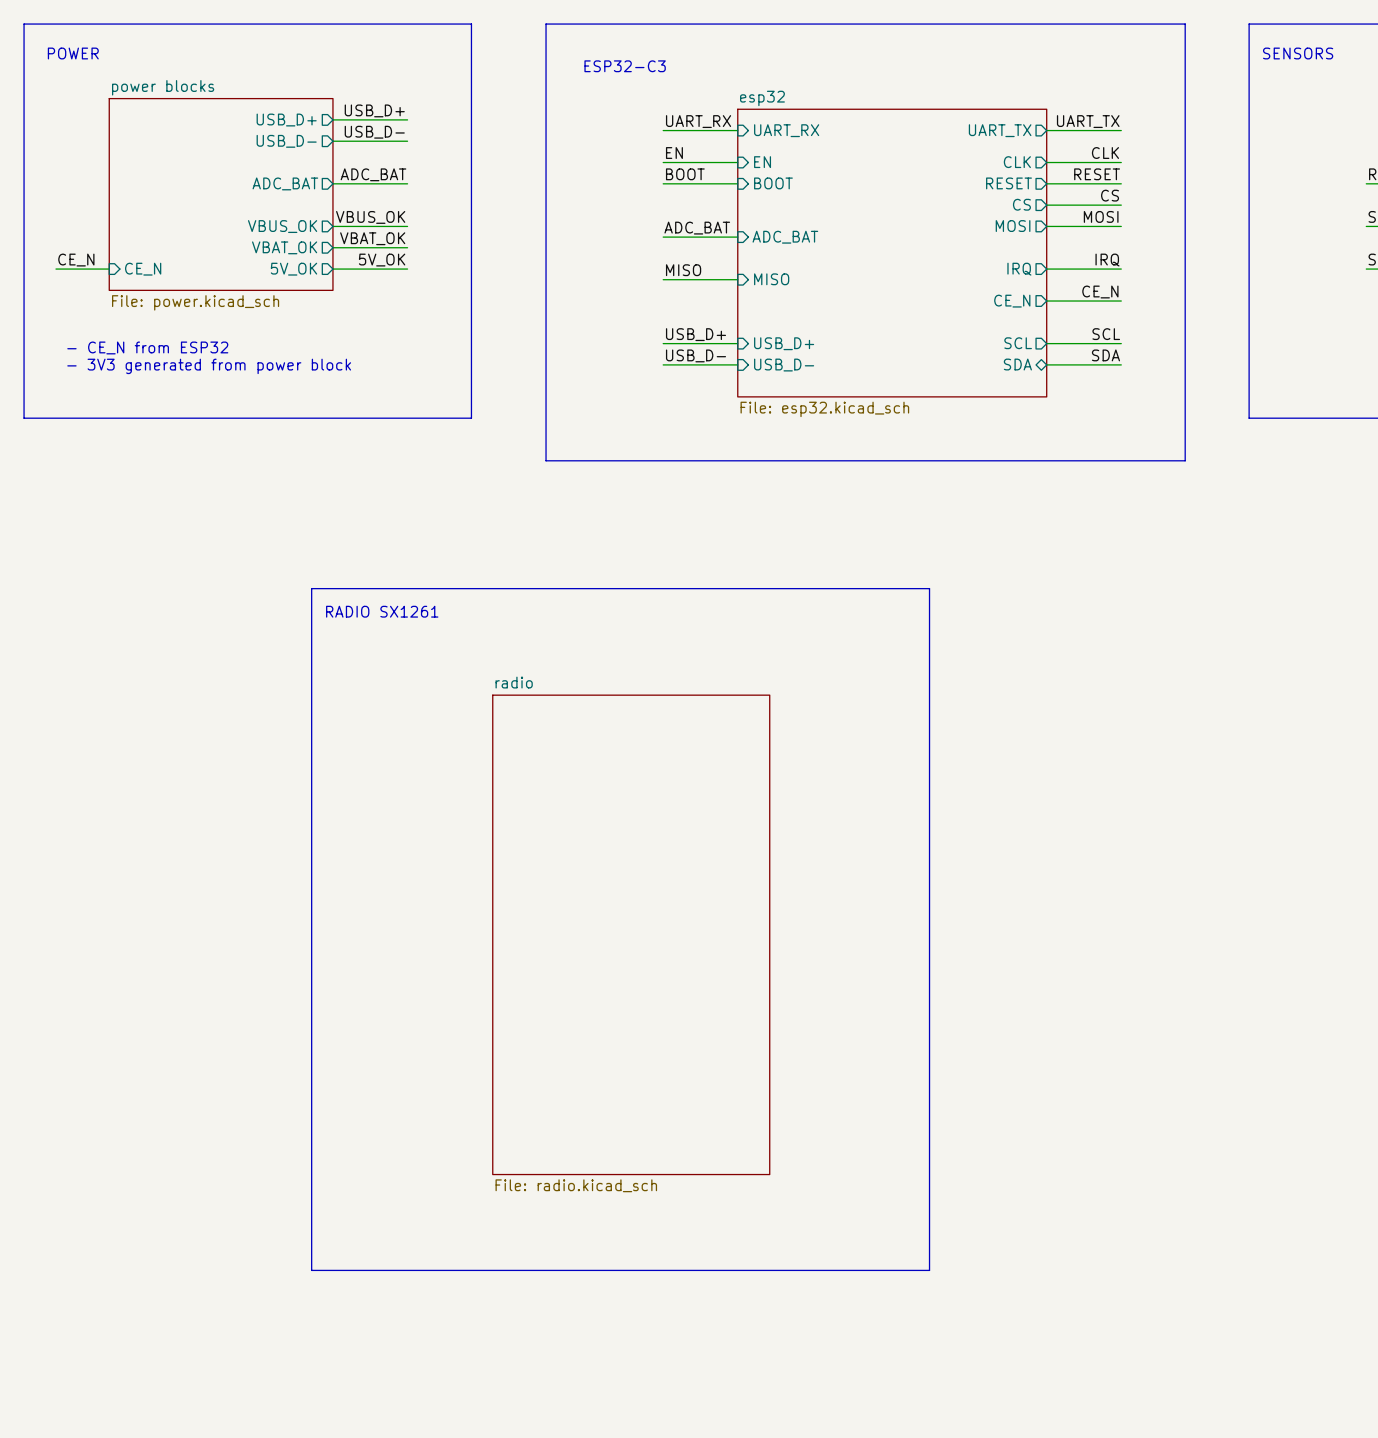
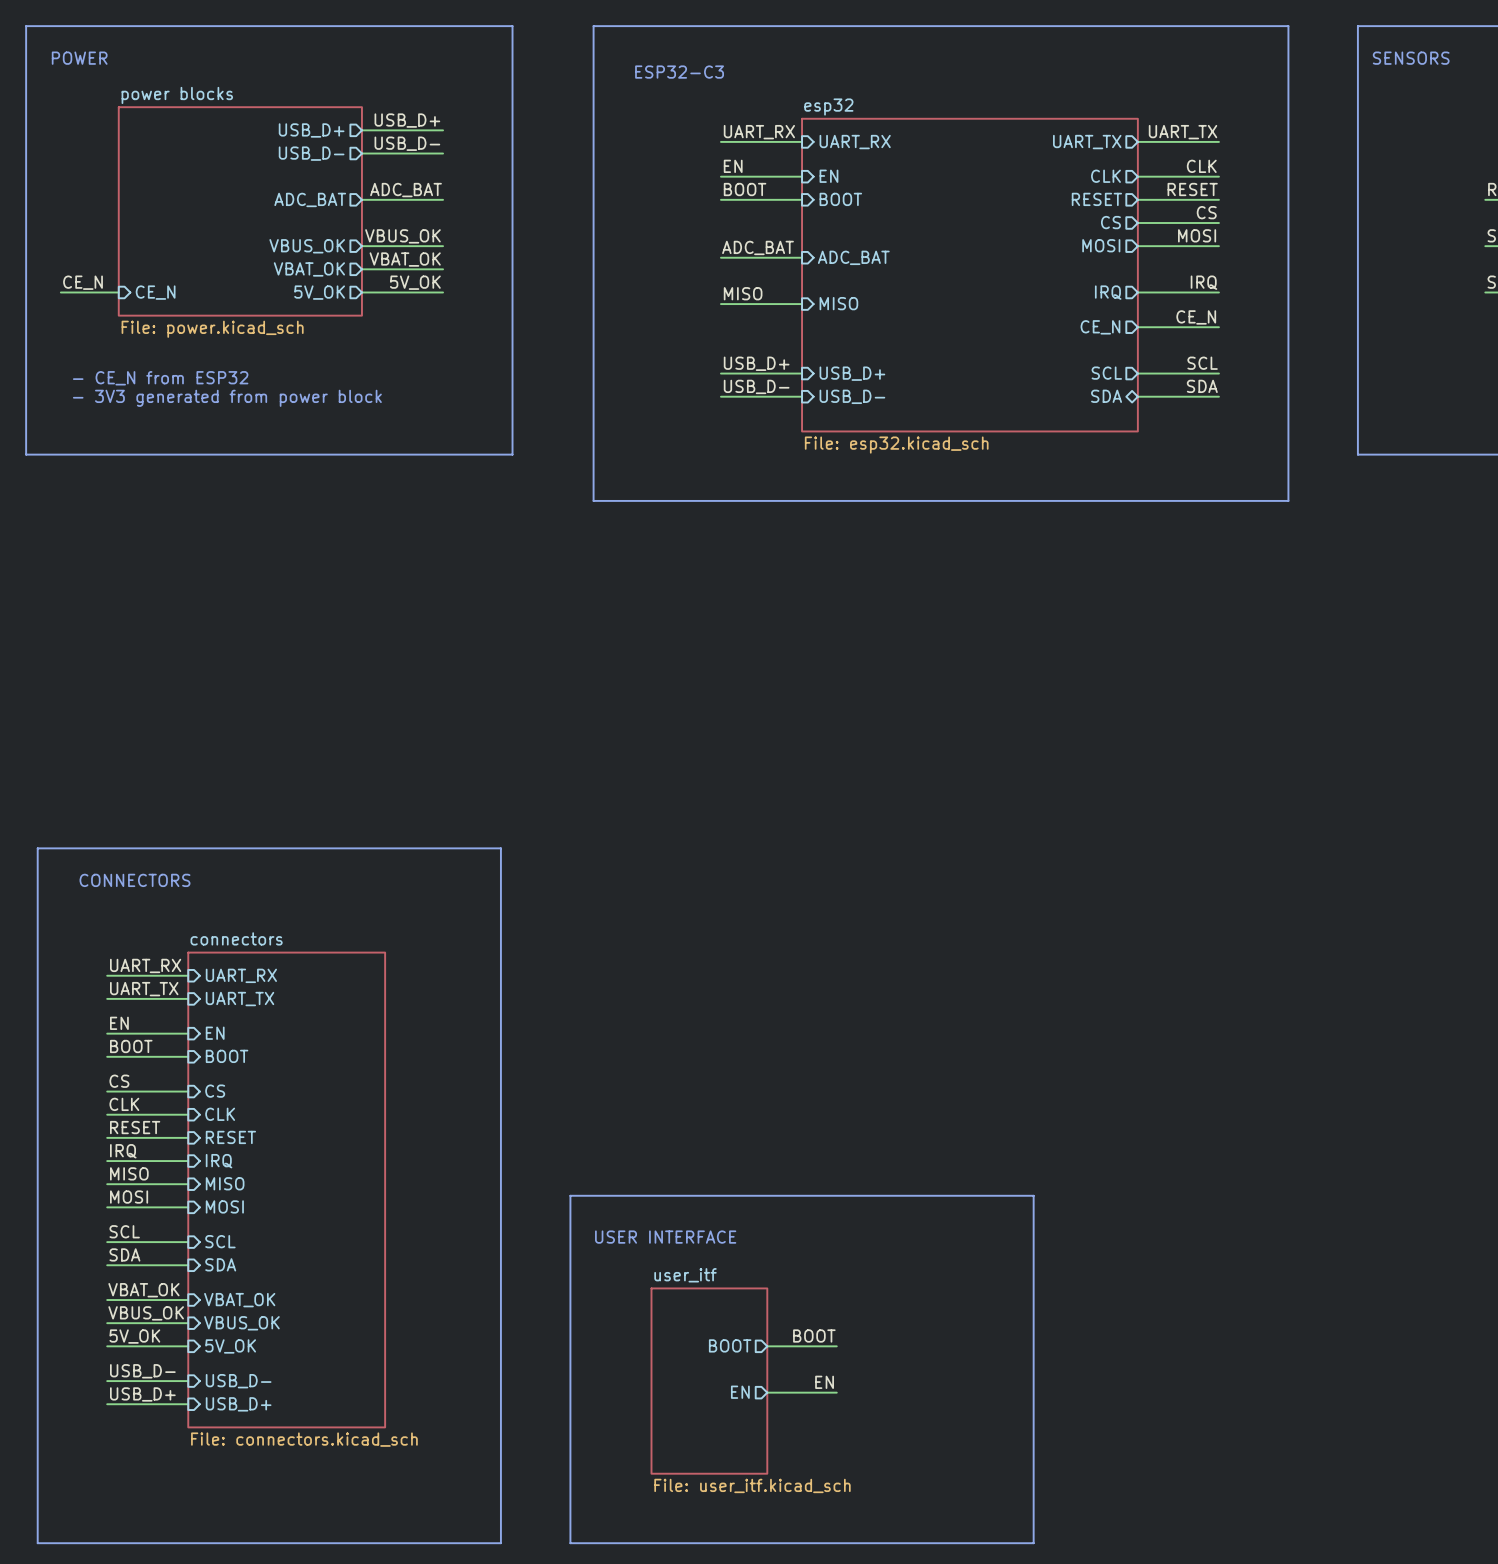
line: (311, 588) (311, 1270) (929, 1270) (929, 588) (311, 588) -> none
text: RADIO SX1261 (382, 611) -> none
line: none -> (37, 848) (500, 848) (500, 1543) (37, 1543) (37, 848)
text: none -> CONNECTORS (134, 880)
label: none -> UART_RX (145, 965)
wire: none -> (107, 975) (188, 975)
sheet pin: none -> UART_RX (241, 975)
label: none -> UART_TX (144, 989)
wire: none -> (107, 998) (188, 998)
sheet pin: none -> UART_TX (240, 999)
sheet radio: File: radio.kicad_sch (631, 934) -> none
label: none -> EN (119, 1023)
wire: none -> (107, 1033) (188, 1033)
sheet pin: none -> EN (215, 1033)
label: none -> BOOT (131, 1046)
sheet pin: none -> BOOT (227, 1056)
wire: none -> (107, 1056) (188, 1056)
label: none -> CS (119, 1081)
sheet pin: none -> CS (215, 1091)
wire: none -> (107, 1091) (188, 1091)
label: none -> CLK (124, 1104)
wire: none -> (107, 1114) (188, 1114)
sheet pin: none -> CLK (220, 1114)
label: none -> RESET (135, 1127)
wire: none -> (107, 1137) (188, 1137)
sheet pin: none -> RESET (230, 1137)
label: none -> IRQ (123, 1151)
wire: none -> (107, 1161) (188, 1161)
sheet pin: none -> IRQ (219, 1161)
label: none -> MISO (129, 1173)
sheet pin: none -> MISO (225, 1183)
wire: none -> (107, 1184) (188, 1184)
sheet connectors: none -> File: connectors.kicad_sch (286, 1189)
line: none -> (570, 1195) (570, 1543) (1033, 1543) (1033, 1195) (570, 1195)
label: none -> MOSI (129, 1197)
wire: none -> (107, 1207) (188, 1207)
sheet pin: none -> MOSI (224, 1206)
label: none -> SCL (124, 1231)
text: none -> USER INTERFACE (665, 1237)
wire: none -> (107, 1242) (188, 1242)
sheet pin: none -> SCL (220, 1241)
label: none -> SDA (124, 1254)
wire: none -> (107, 1265) (188, 1265)
sheet pin: none -> SDA (220, 1264)
label: none -> VBAT_OK (143, 1290)
wire: none -> (107, 1300) (188, 1300)
sheet pin: none -> VBAT_OK (239, 1300)
label: none -> VBUS_OK (146, 1313)
wire: none -> (107, 1323) (188, 1323)
sheet pin: none -> VBUS_OK (241, 1323)
label: none -> BOOT (814, 1336)
label: none -> 5V_OK (134, 1336)
wire: none -> (107, 1346) (188, 1346)
sheet pin: none -> 5V_OK (230, 1346)
sheet pin: none -> BOOT (730, 1345)
wire: none -> (767, 1346) (836, 1346)
label: none -> USB_D- (142, 1371)
wire: none -> (107, 1381) (188, 1381)
sheet pin: none -> USB_D- (238, 1381)
sheet user_itf: none -> File: user_itf.kicad_sch (709, 1381)
label: none -> EN (824, 1382)
sheet pin: none -> EN (740, 1392)
wire: none -> (767, 1392) (836, 1392)
label: none -> USB_D+ (142, 1394)
wire: none -> (107, 1404) (188, 1404)
sheet pin: none -> USB_D+ (238, 1404)

